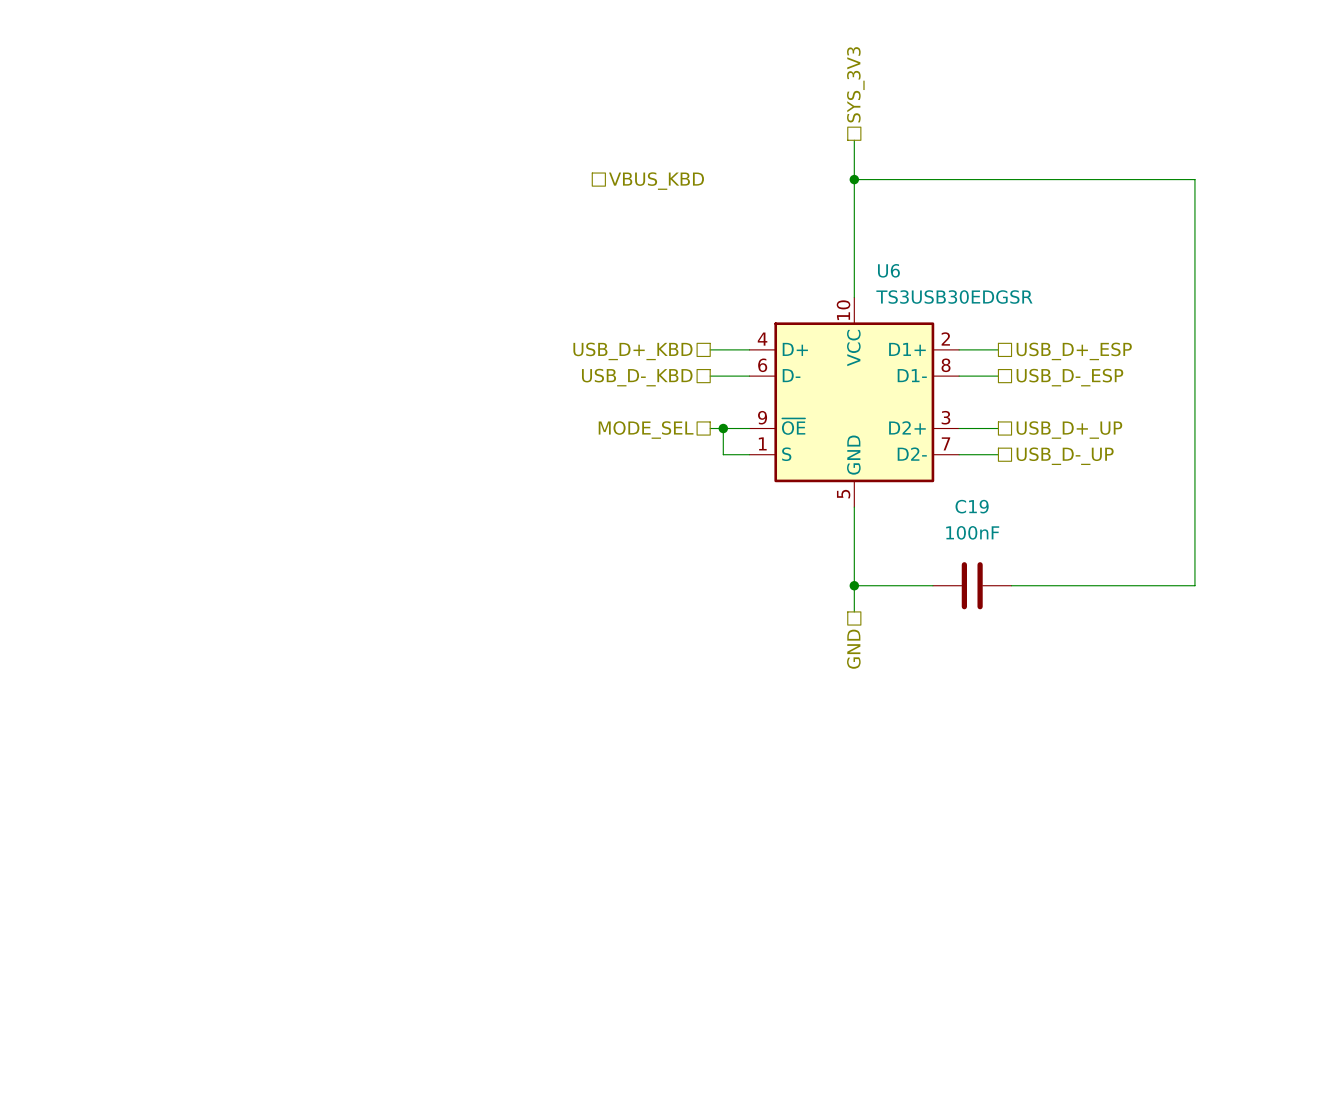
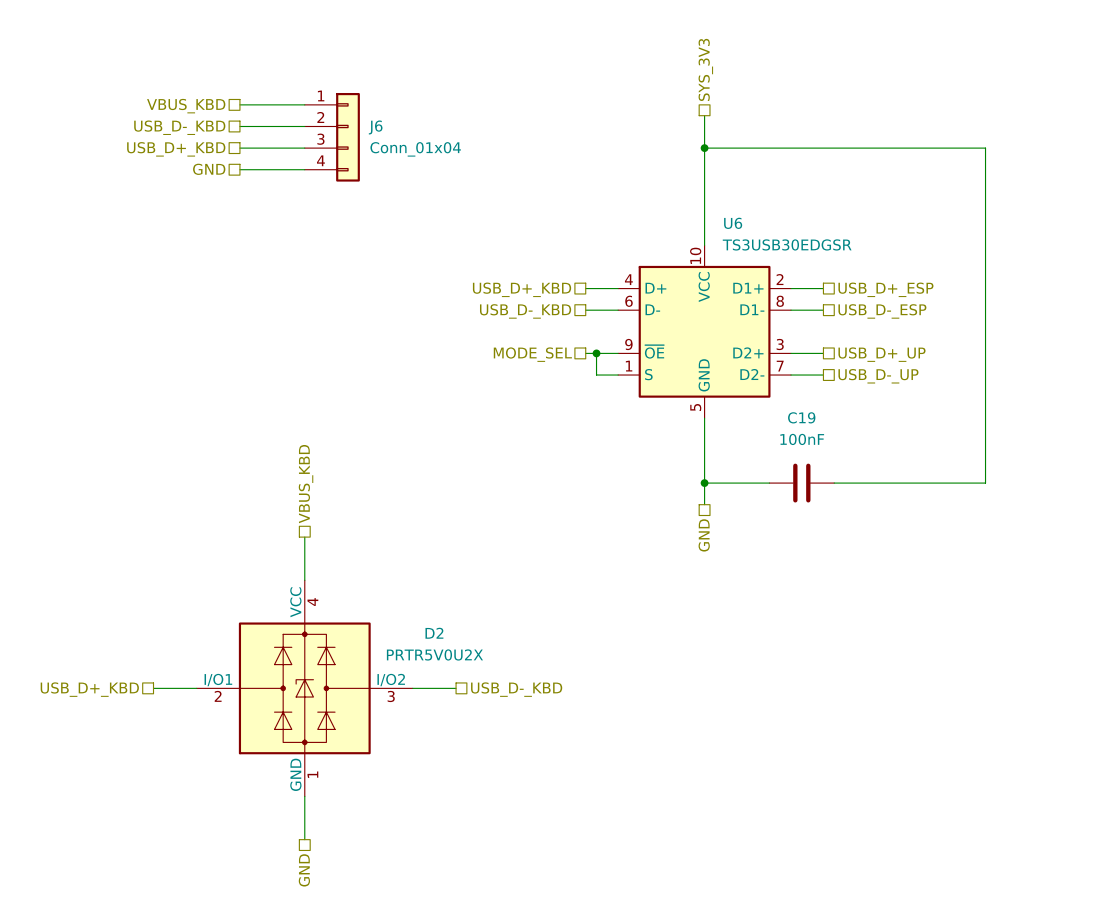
wire: none -> (239, 104) (304, 104)
hierarchical label: none -> VBUS_KBD (186, 106)
wire: none -> (239, 126) (304, 126)
hierarchical label: none -> USB_D-_KBD (179, 127)
J6: none -> Conn_01x04 (332, 137)
wire: none -> (239, 148) (304, 148)
hierarchical label: none -> USB_D+_KBD (176, 149)
hierarchical label: VBUS_KBD (656, 181) -> none
hierarchical label: none -> GND (209, 169)
wire: none -> (239, 169) (304, 169)
hierarchical label: none -> VBUS_KBD (306, 484)
wire: none -> (304, 537) (304, 580)
wire: none -> (153, 688) (196, 688)
D2: none -> PRTR5V0U2X (304, 688)
wire: none -> (412, 688) (456, 688)
hierarchical label: none -> USB_D+_KBD (89, 689)
hierarchical label: none -> USB_D-_KBD (516, 689)
wire: none -> (304, 796) (304, 839)
hierarchical label: none -> GND (304, 870)

